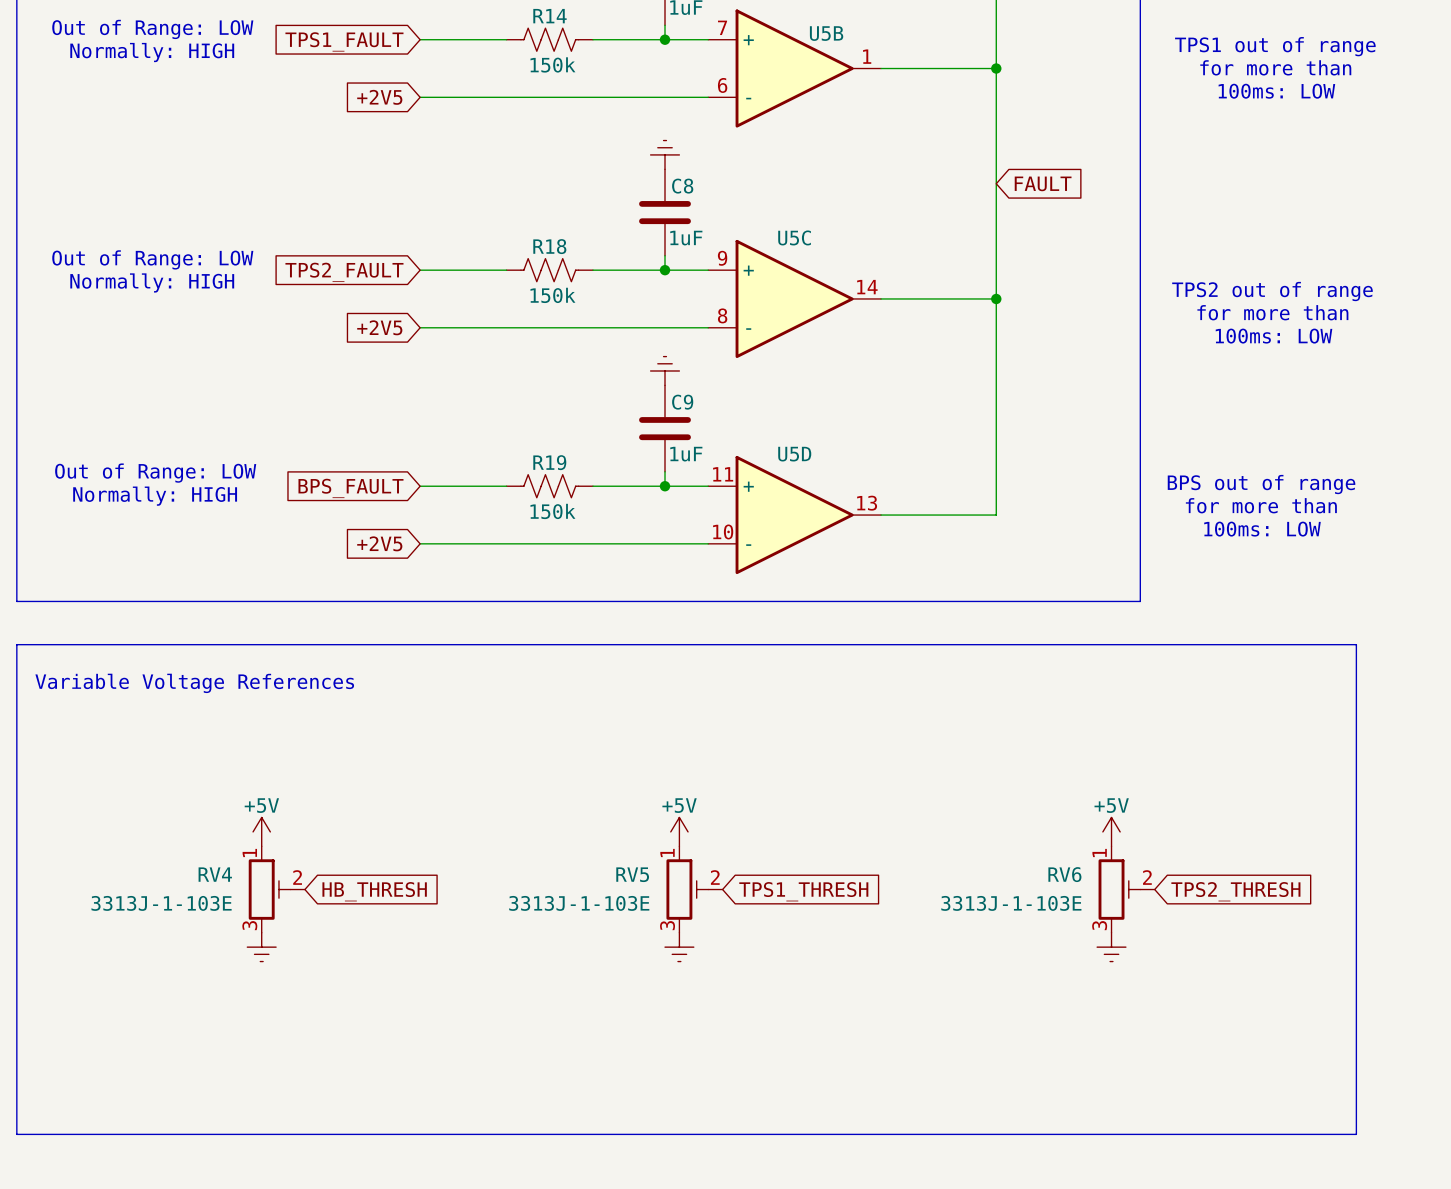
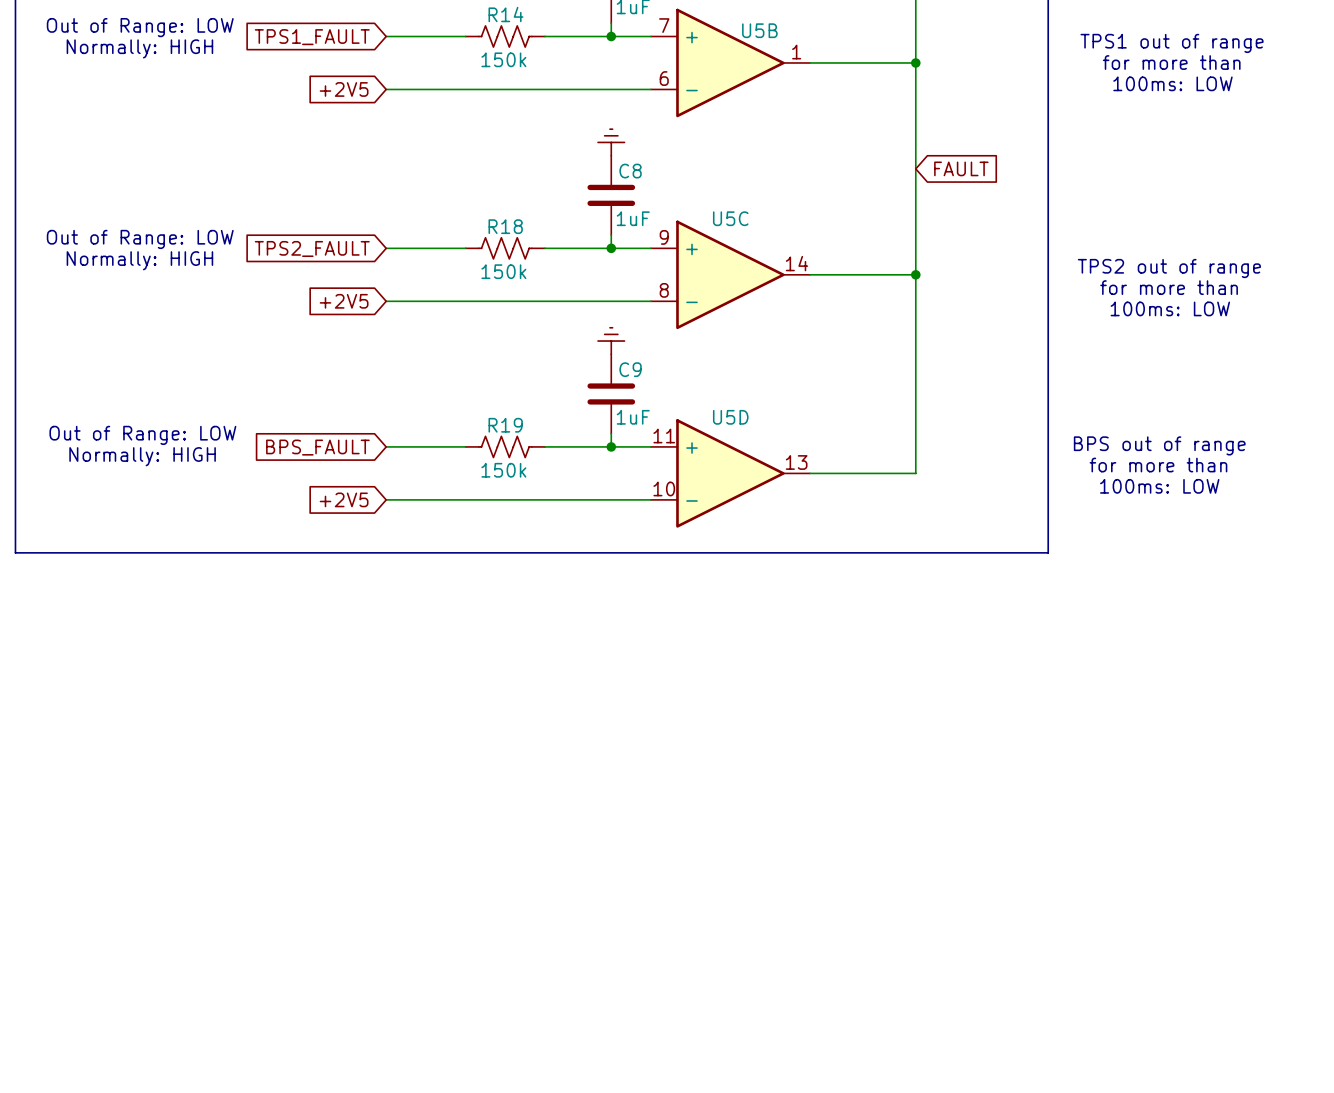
line: (16, 644) (1356, 644) (1356, 1134) (16, 1134) (16, 644) -> none
text: Variable Voltage References (194, 683) -> none
power symbol: +5V (261, 831) -> none
power symbol: +5V (679, 831) -> none
power symbol: +5V (1111, 831) -> none
RV4: 3313J-1-103E (276, 889) -> none
RV5: 3313J-1-103E (694, 889) -> none
RV6: 3313J-1-103E (1126, 889) -> none
global label: HB_THRESH (374, 891) -> none
global label: TPS1_THRESH (803, 891) -> none
global label: TPS2_THRESH (1235, 891) -> none
power symbol: (261, 947) -> none
power symbol: (679, 947) -> none
power symbol: (1111, 947) -> none

